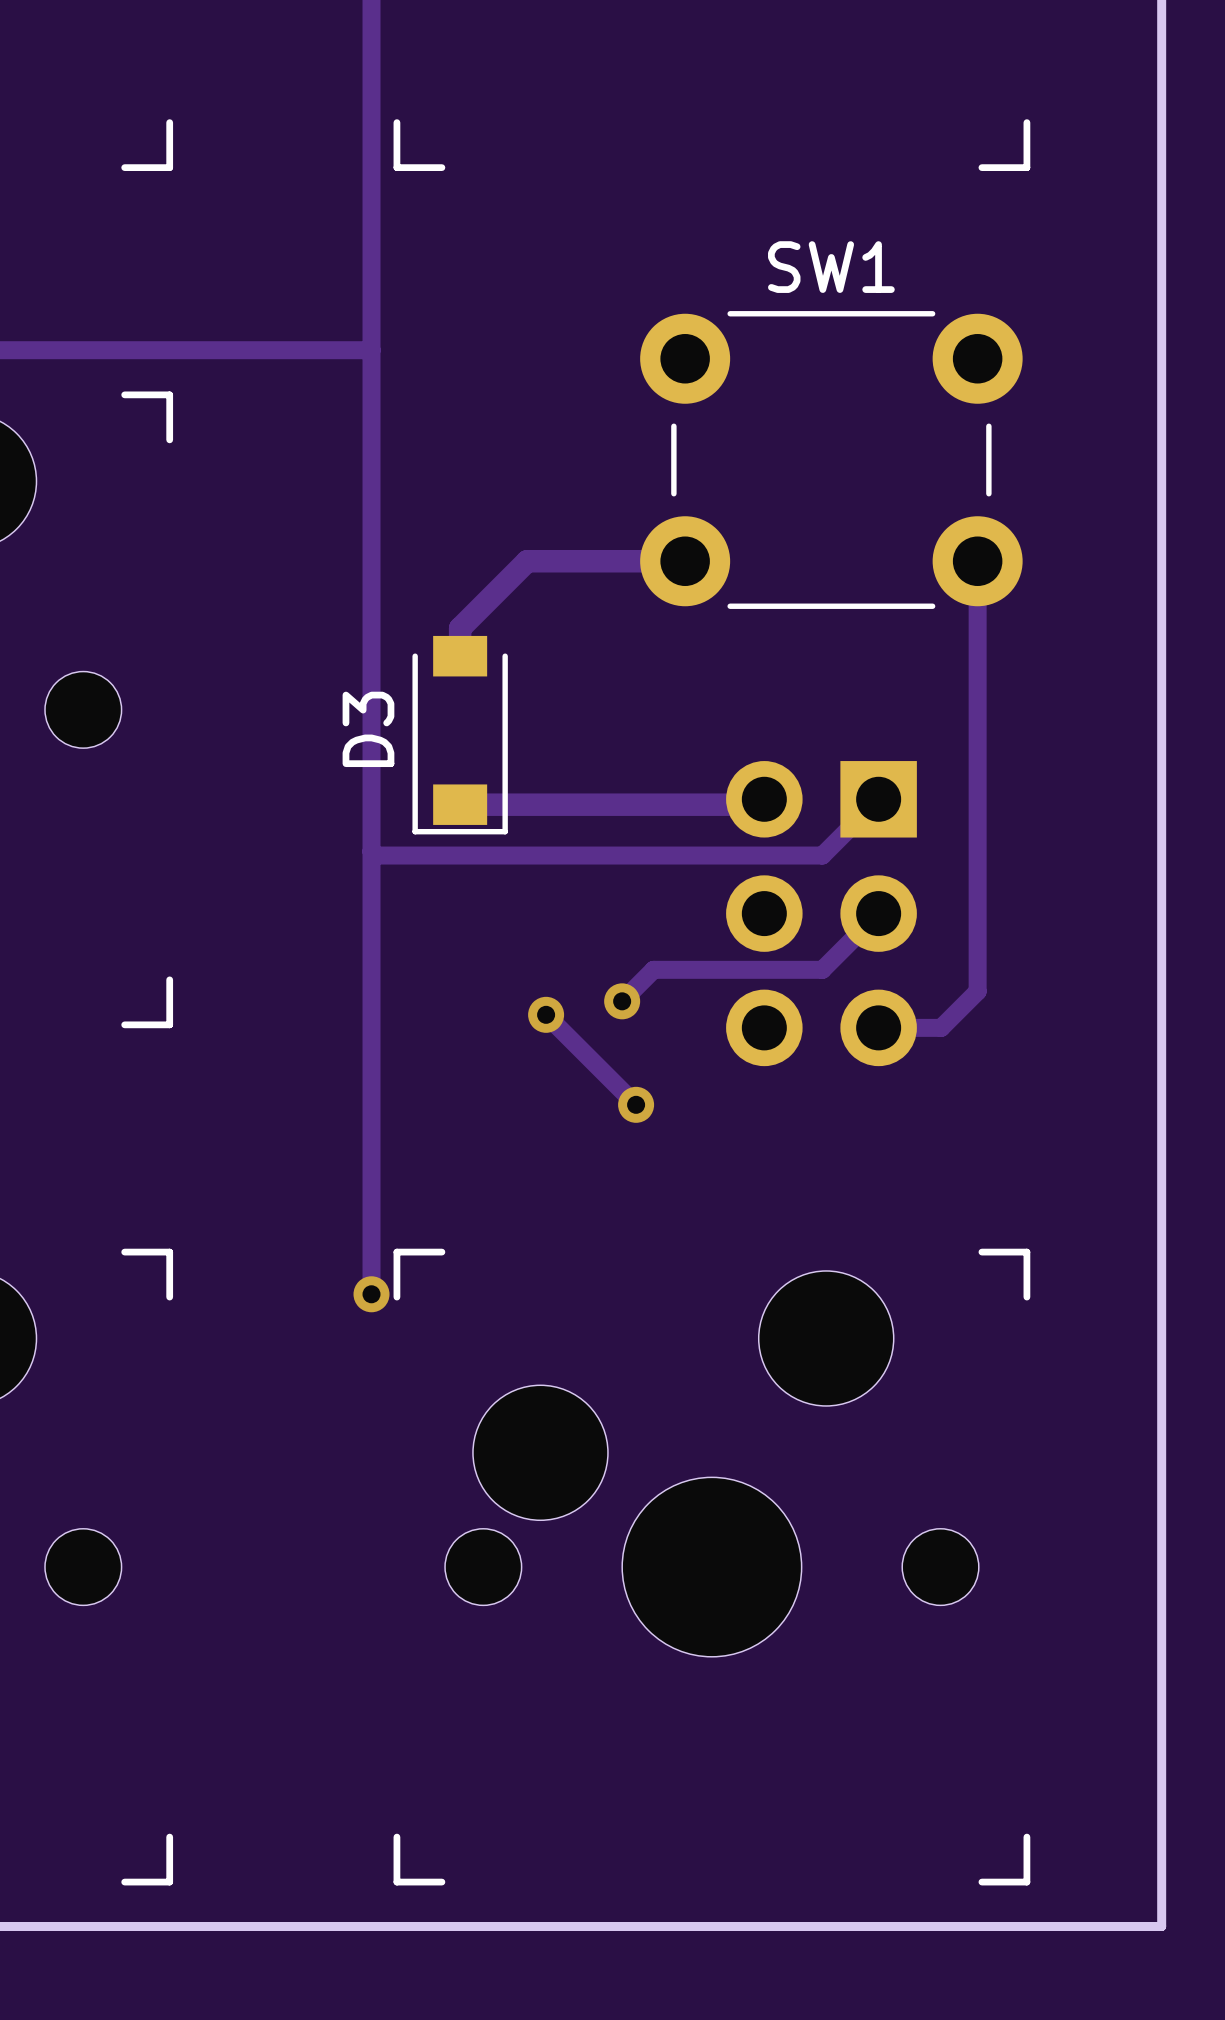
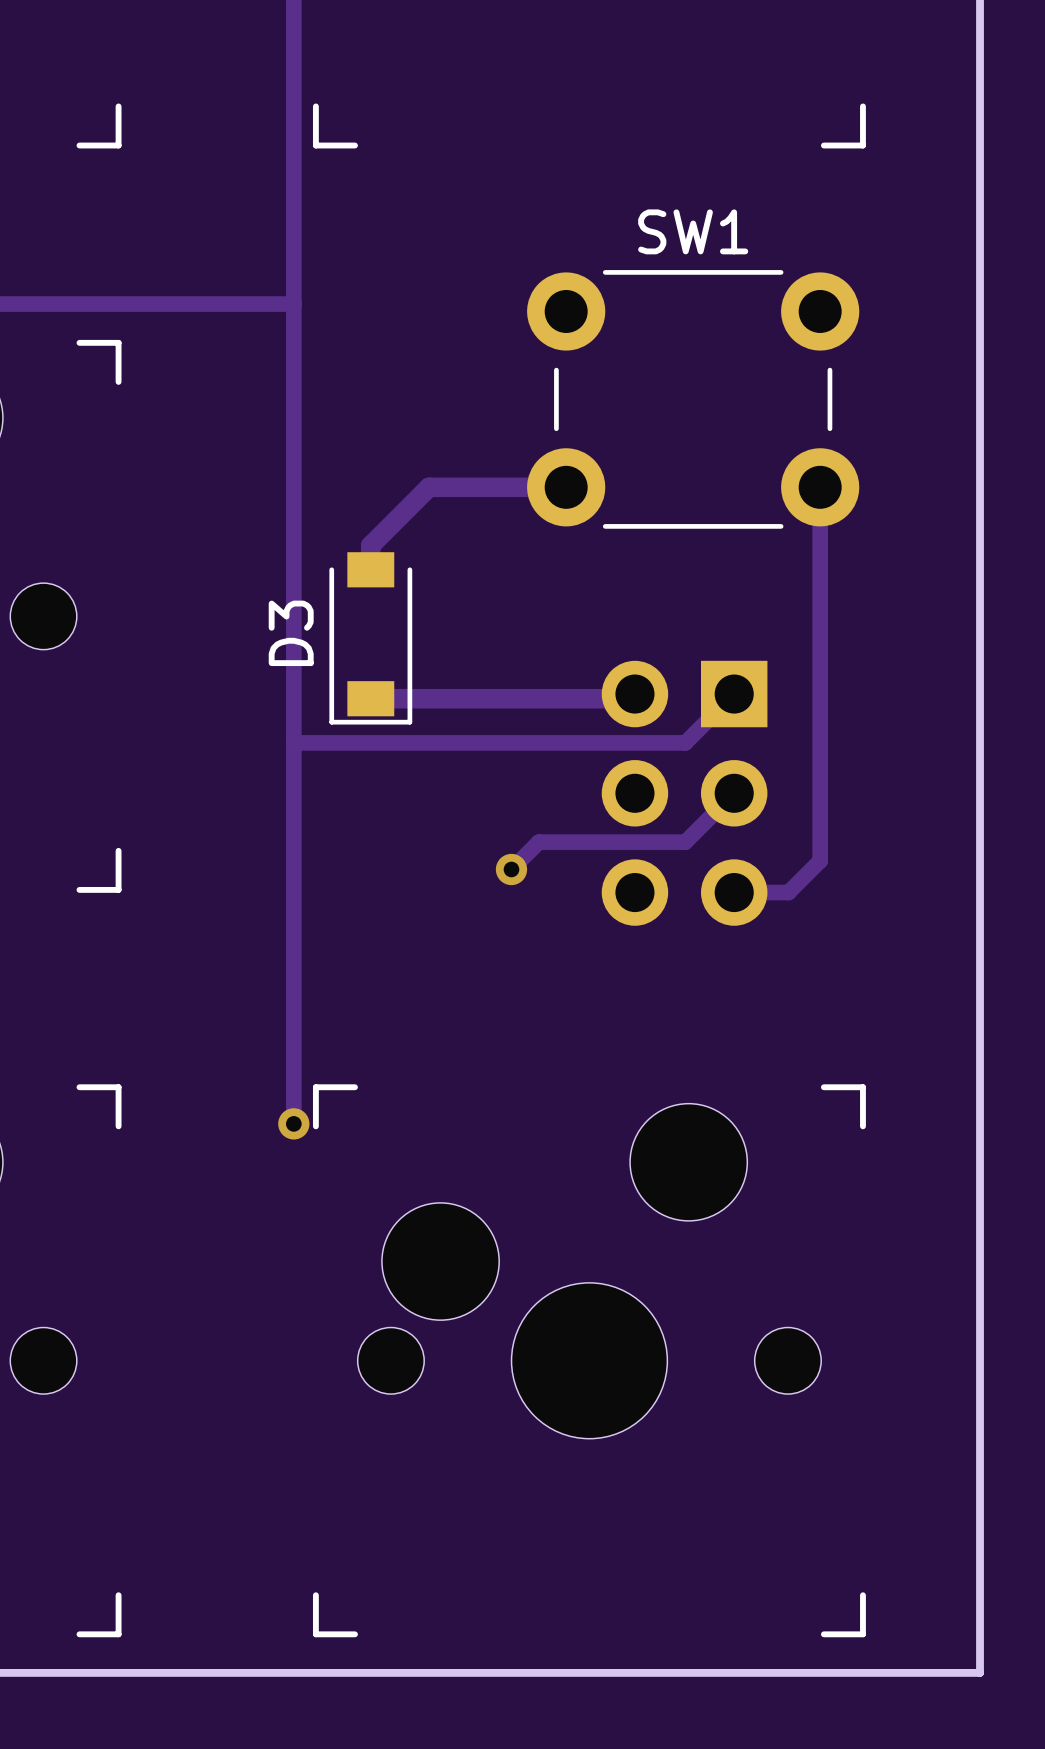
track: (546, 1014) (636, 1104) -> none
via: (546, 1014) -> none
via: (636, 1104) -> none

